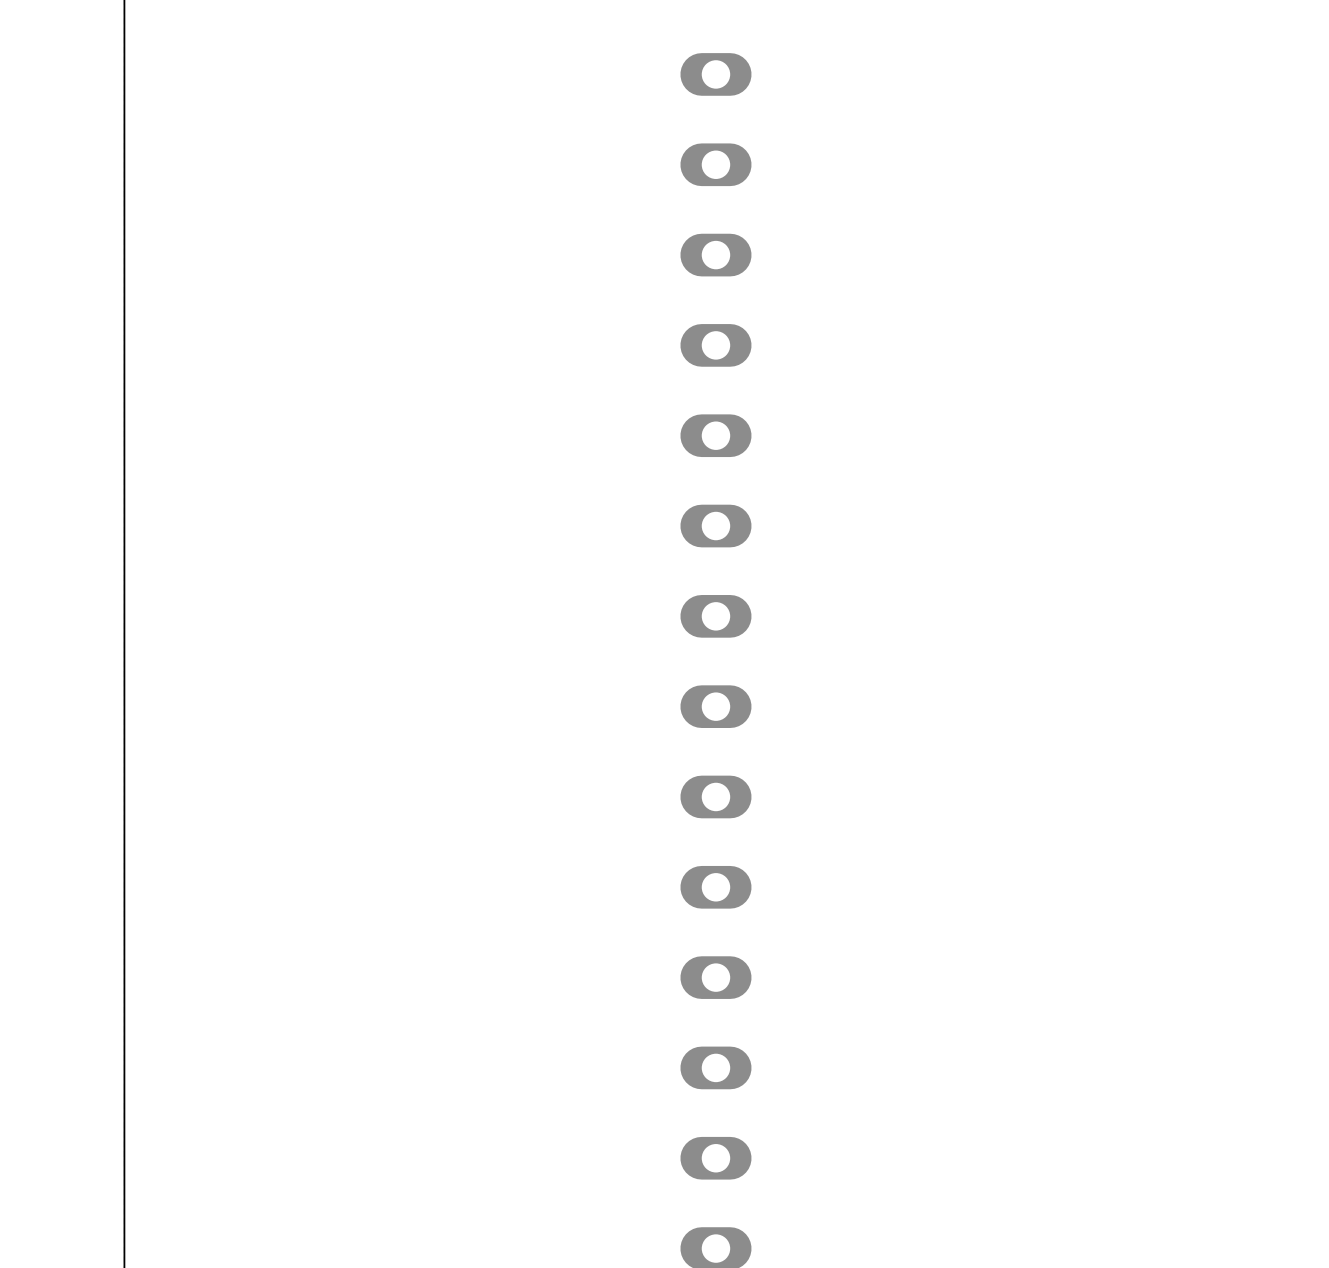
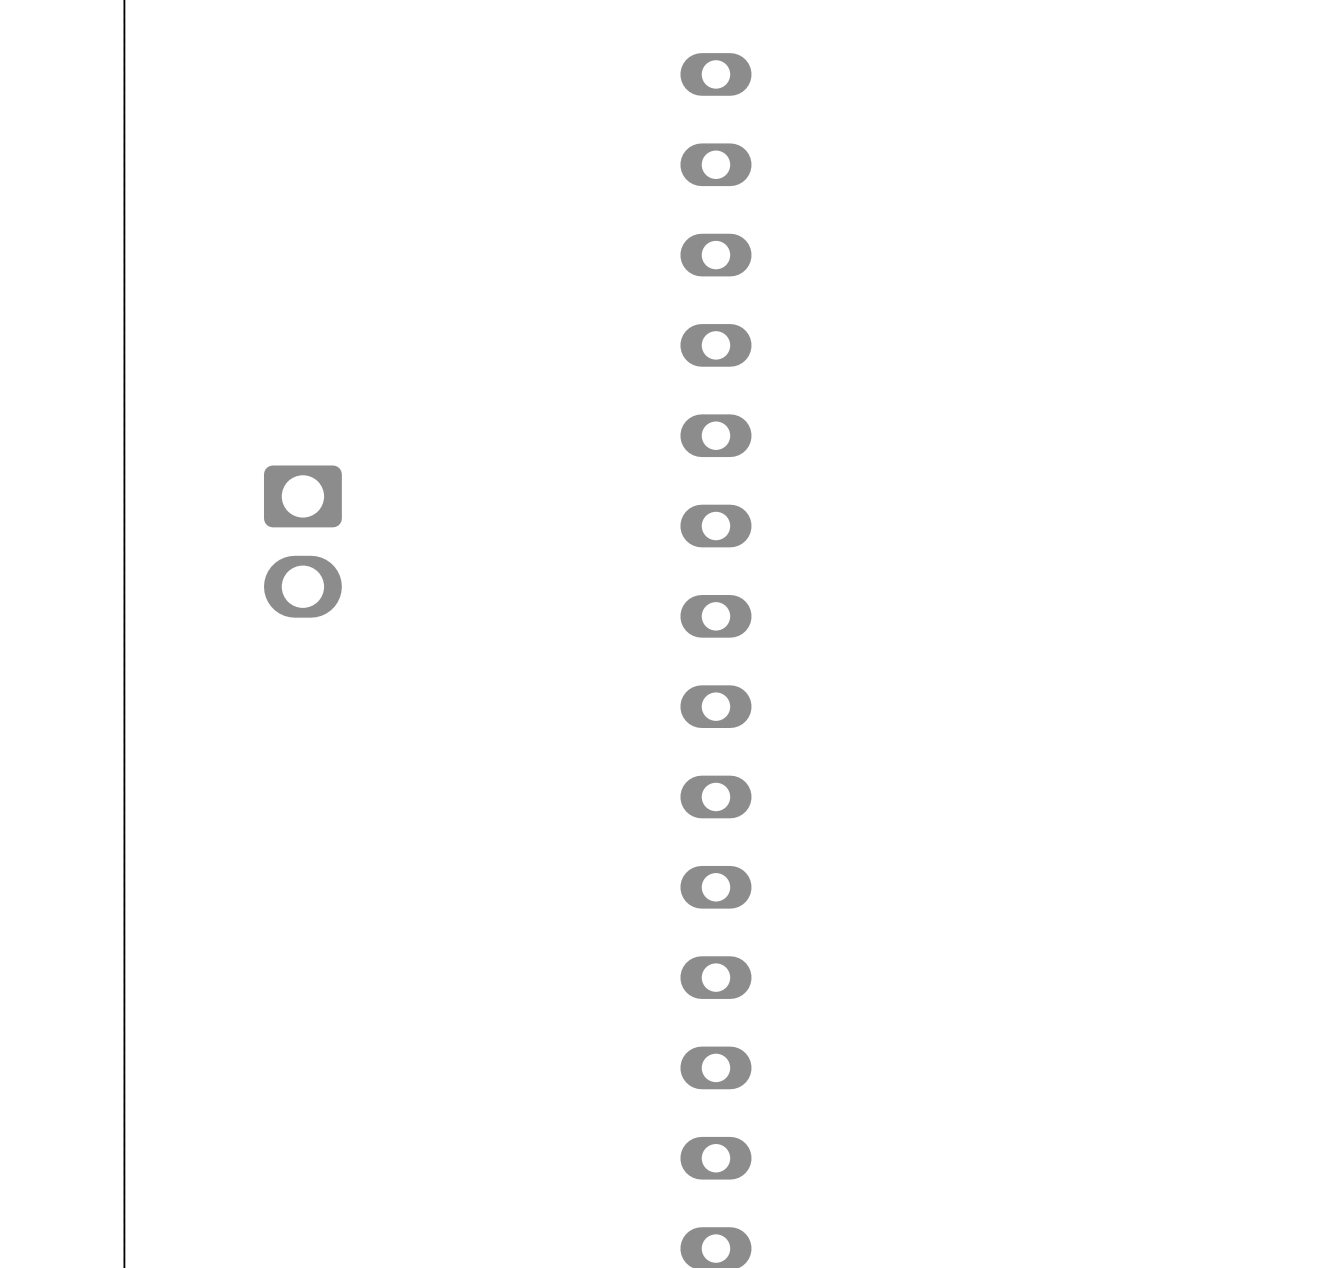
part: none -> (302, 541)

